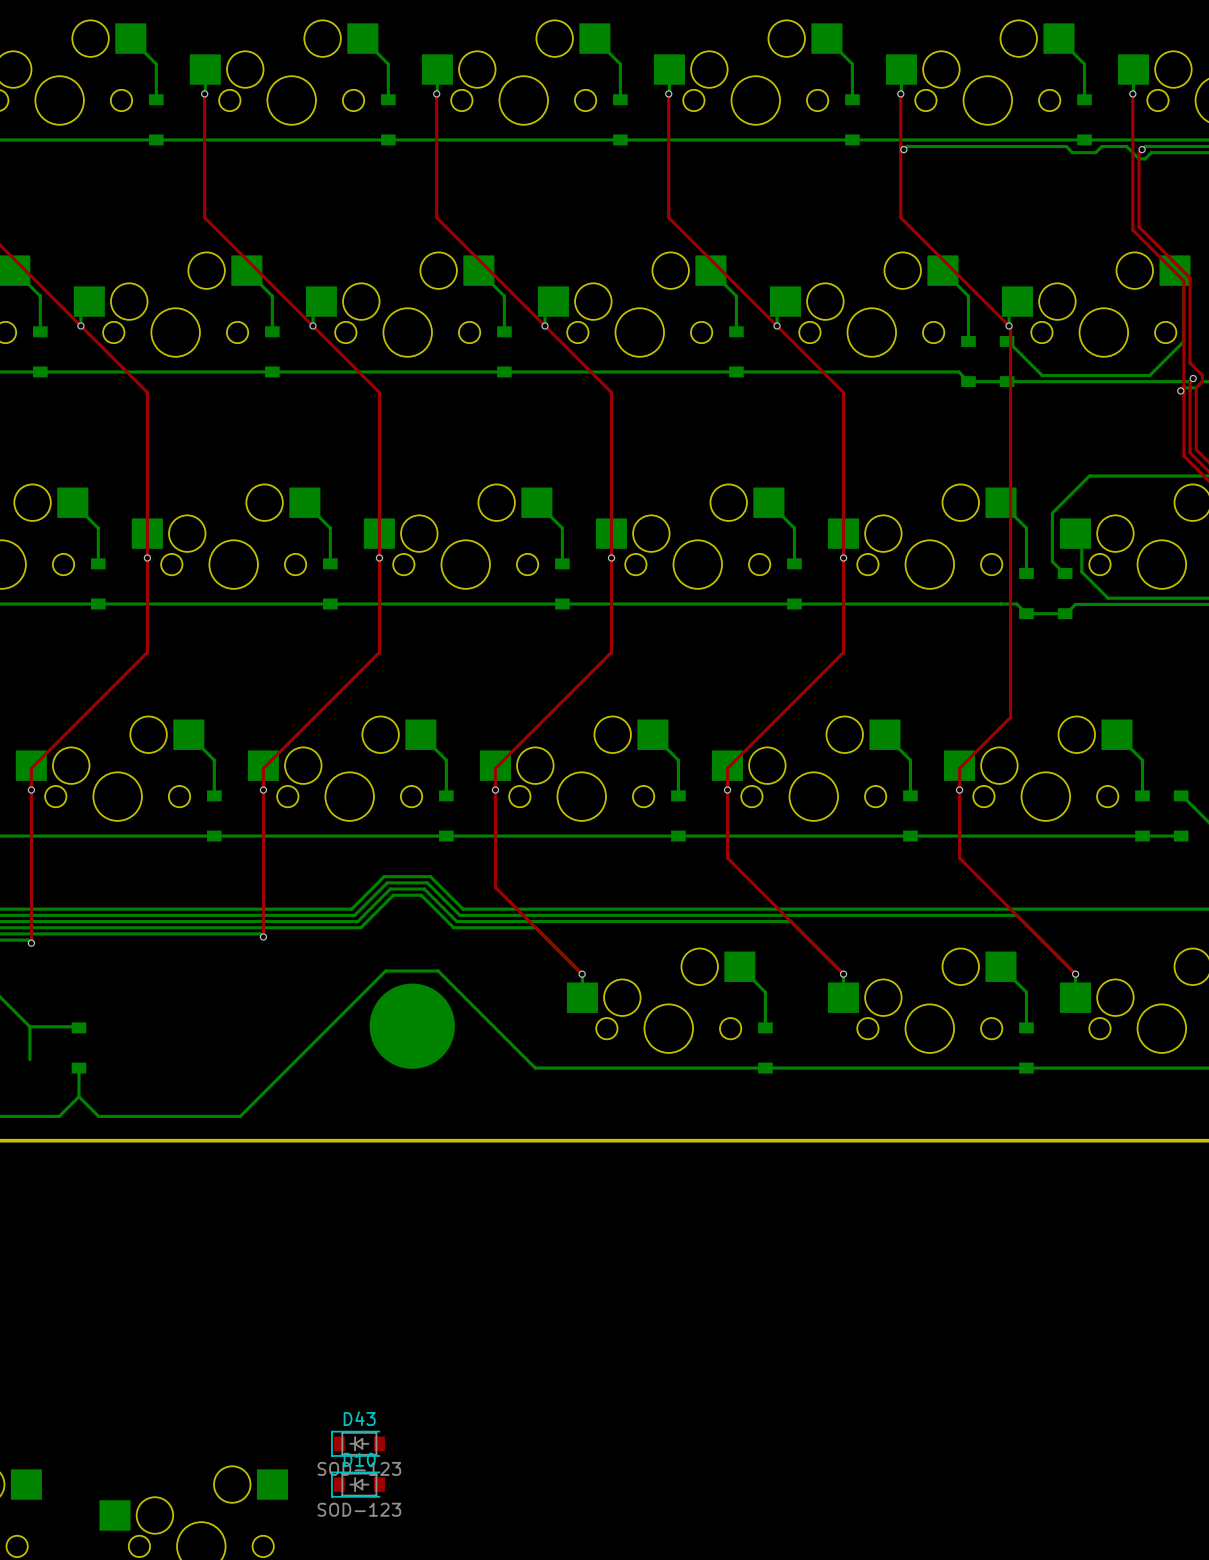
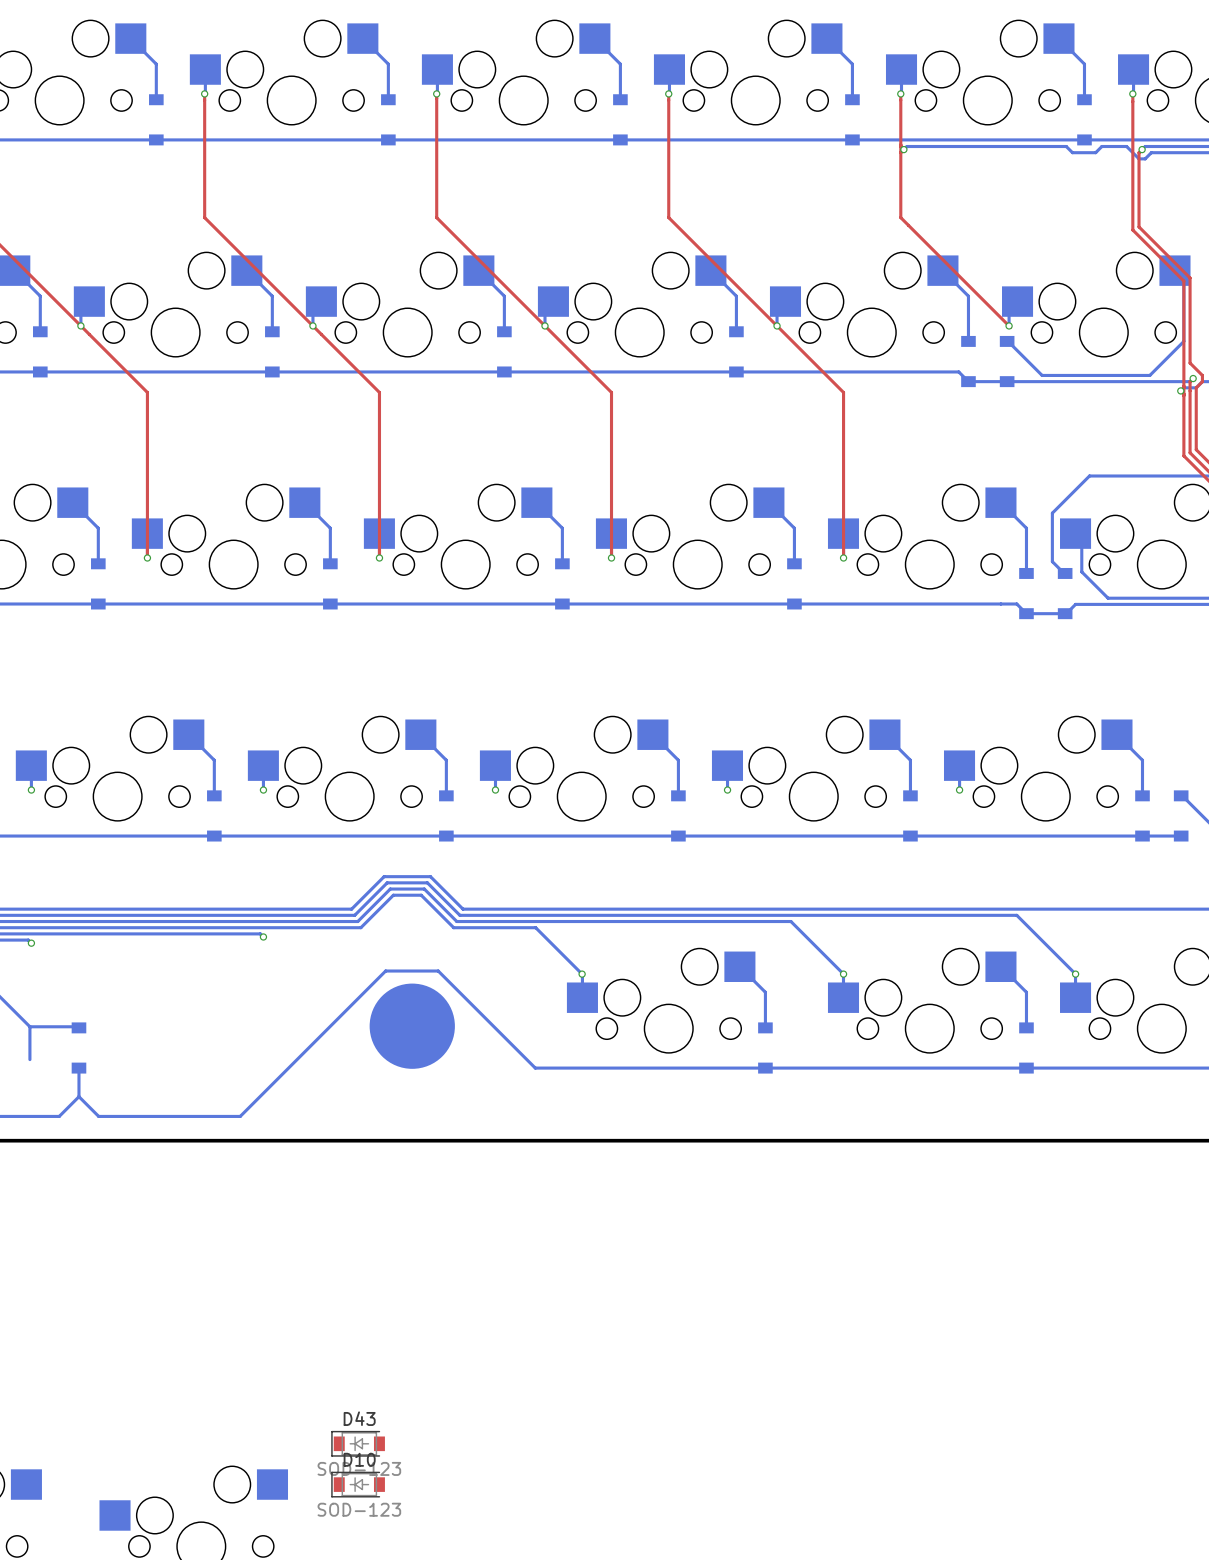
top track: (1010, 327) (1010, 717) (959, 768) (959, 858) (1075, 974) -> none
top track: (147, 557) (147, 652) (31, 768) (31, 943) -> none
top track: (379, 557) (379, 652) (263, 768) (263, 936) -> none
top track: (611, 557) (611, 652) (495, 768) (495, 887) (582, 974) -> none
top track: (843, 557) (843, 652) (727, 768) (727, 858) (843, 974) -> none

